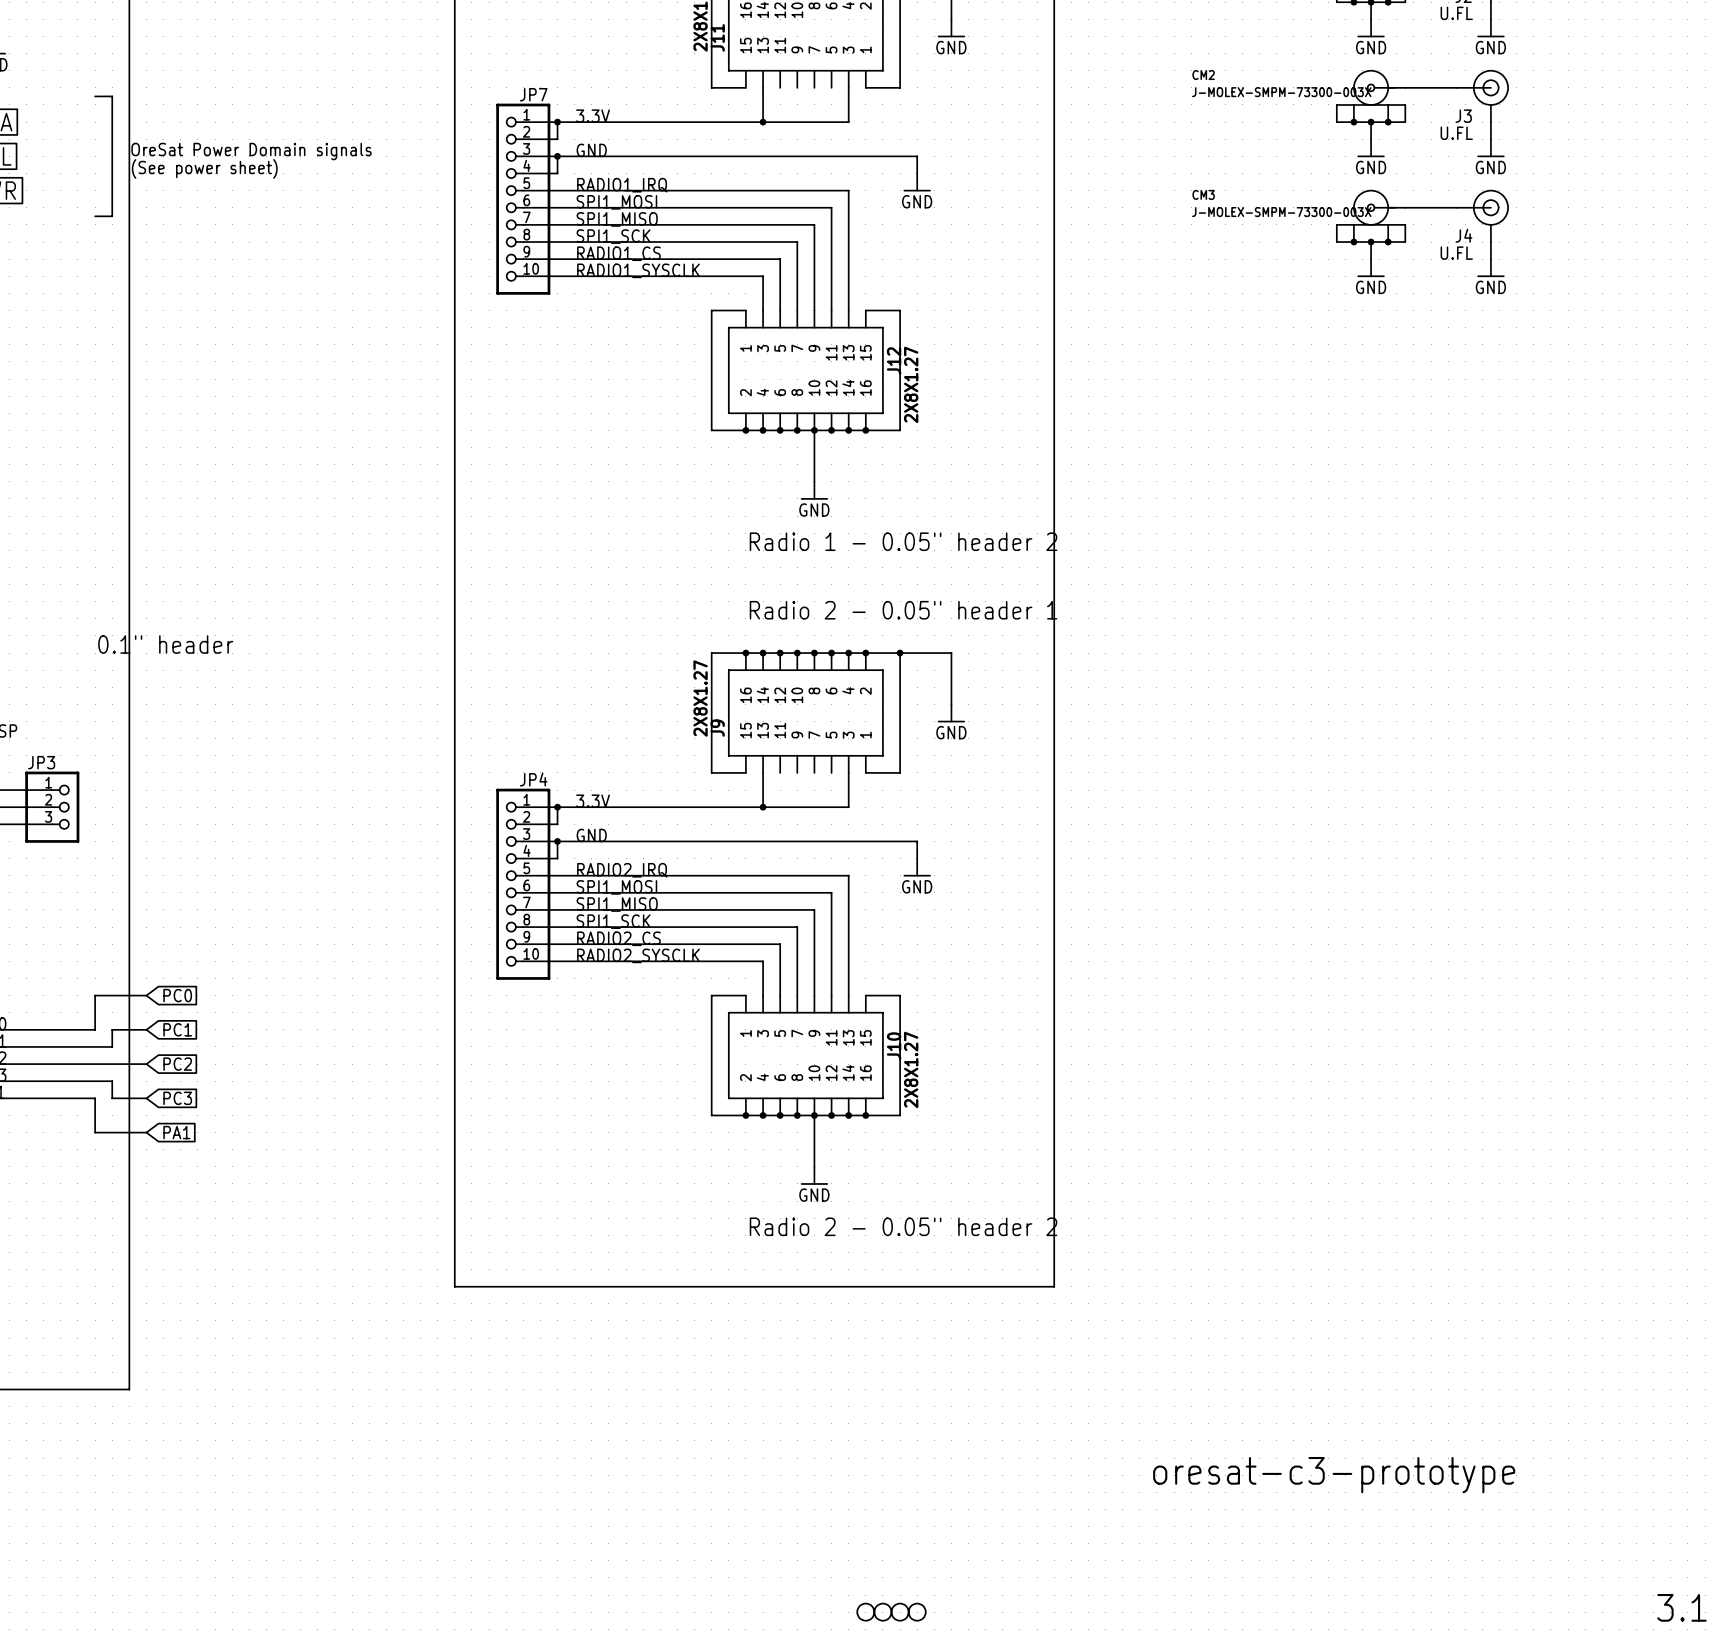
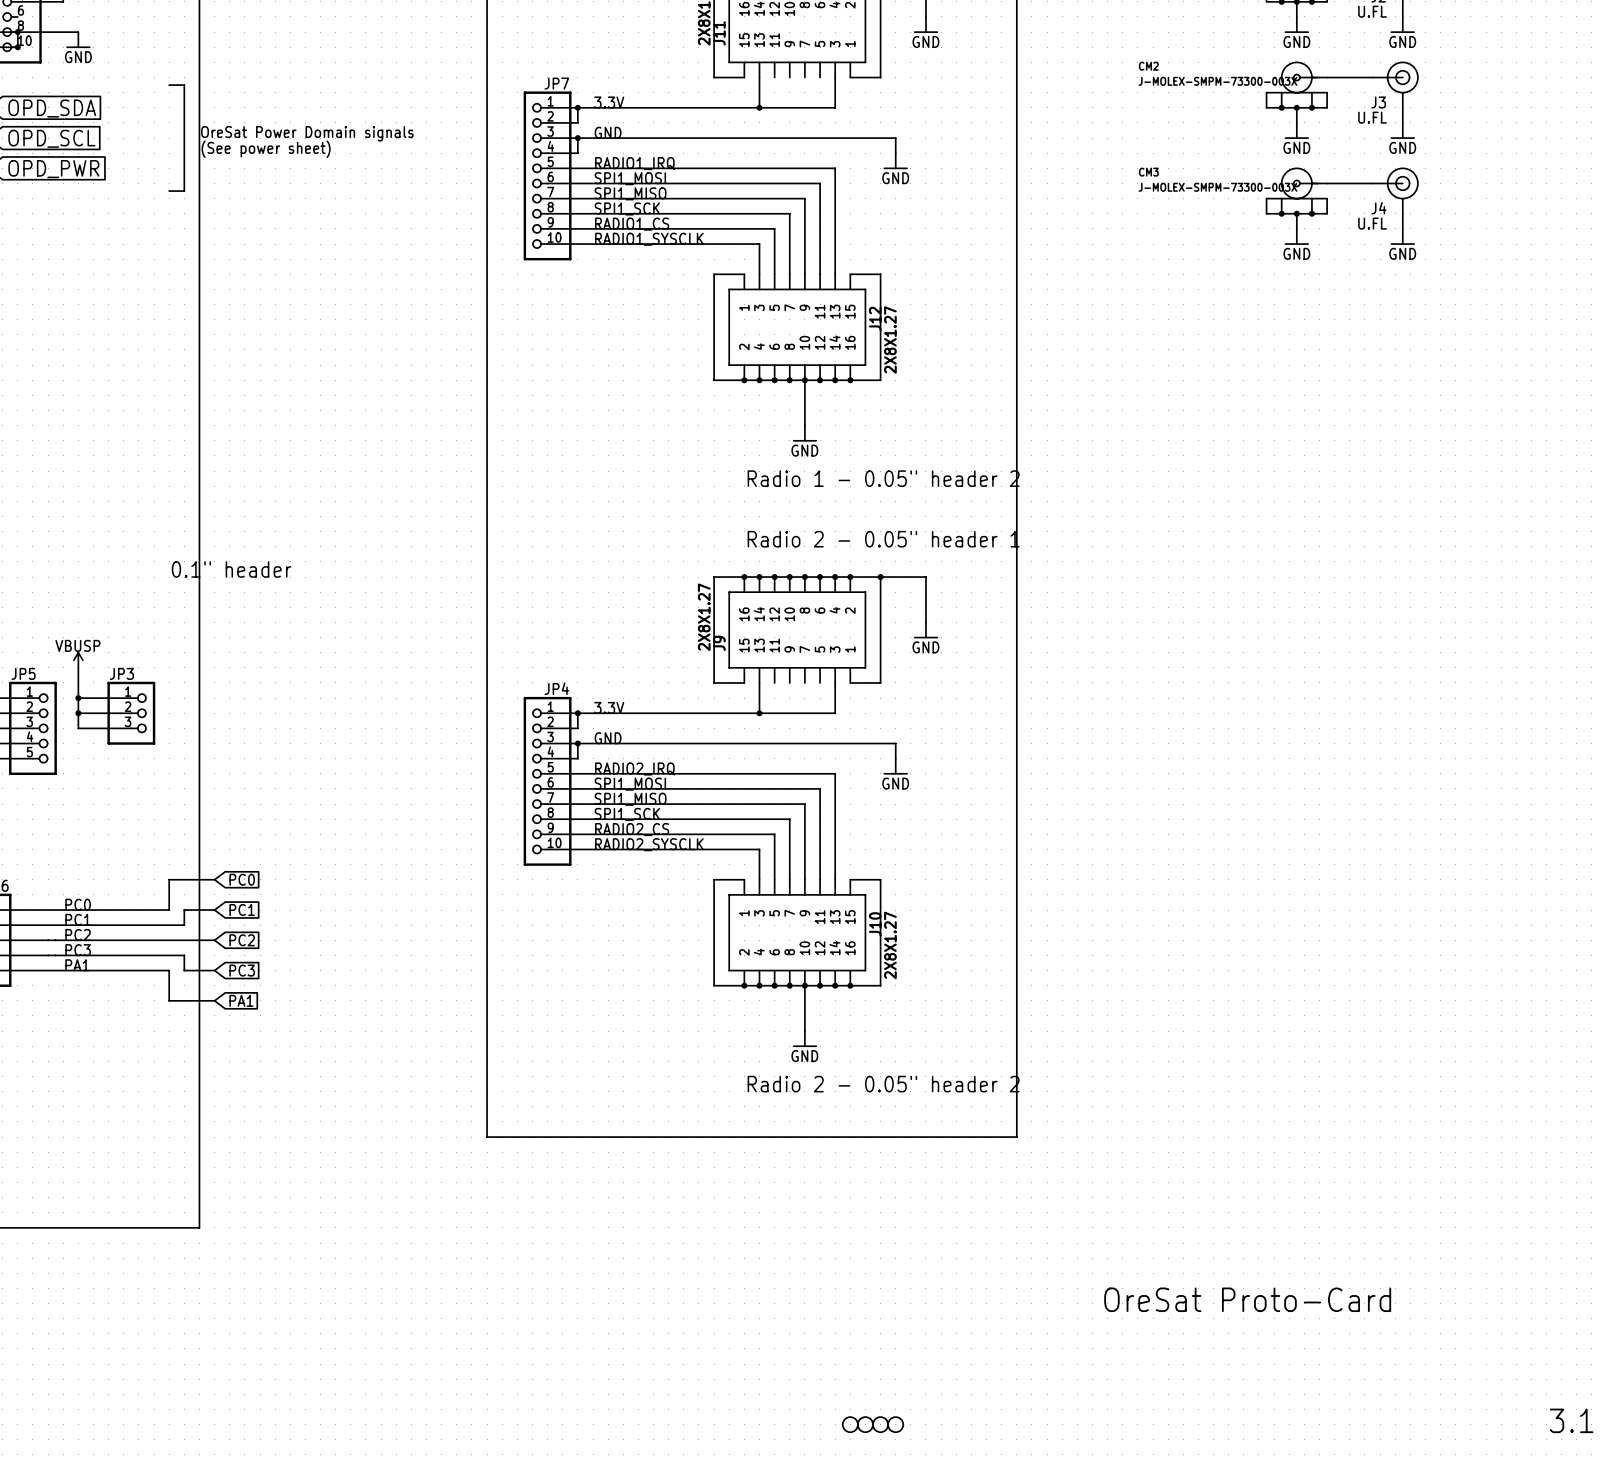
text: oresat-c3-prototype (1334, 1475) -> OreSat Proto-Card (1247, 1299)

